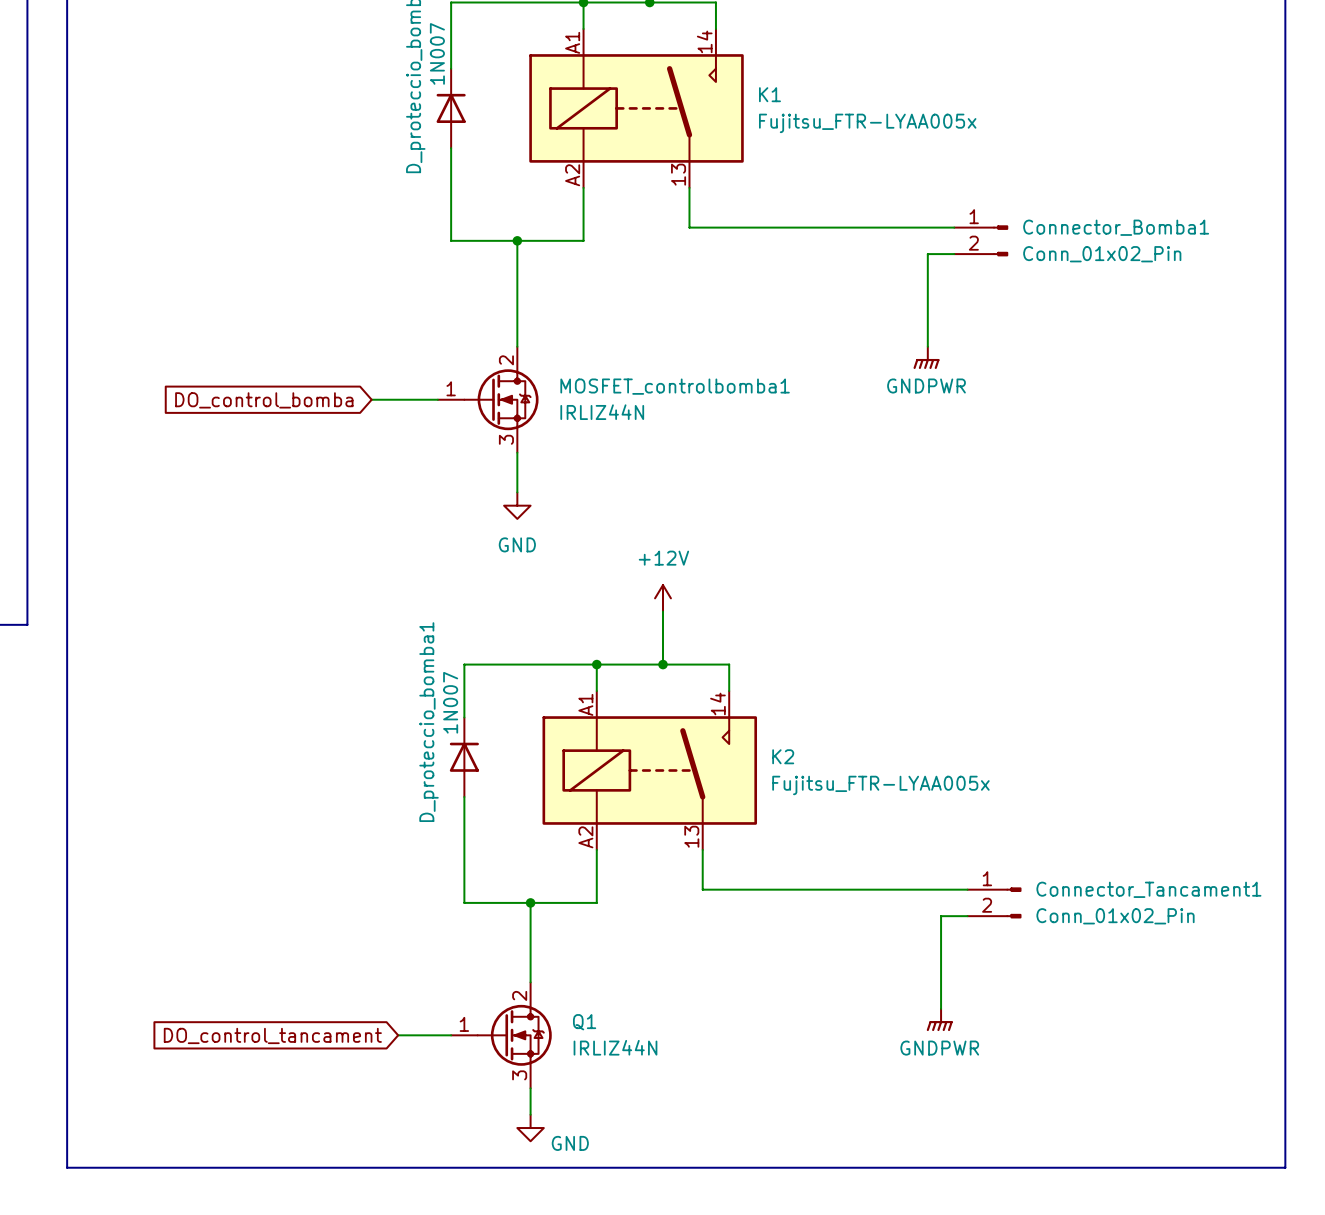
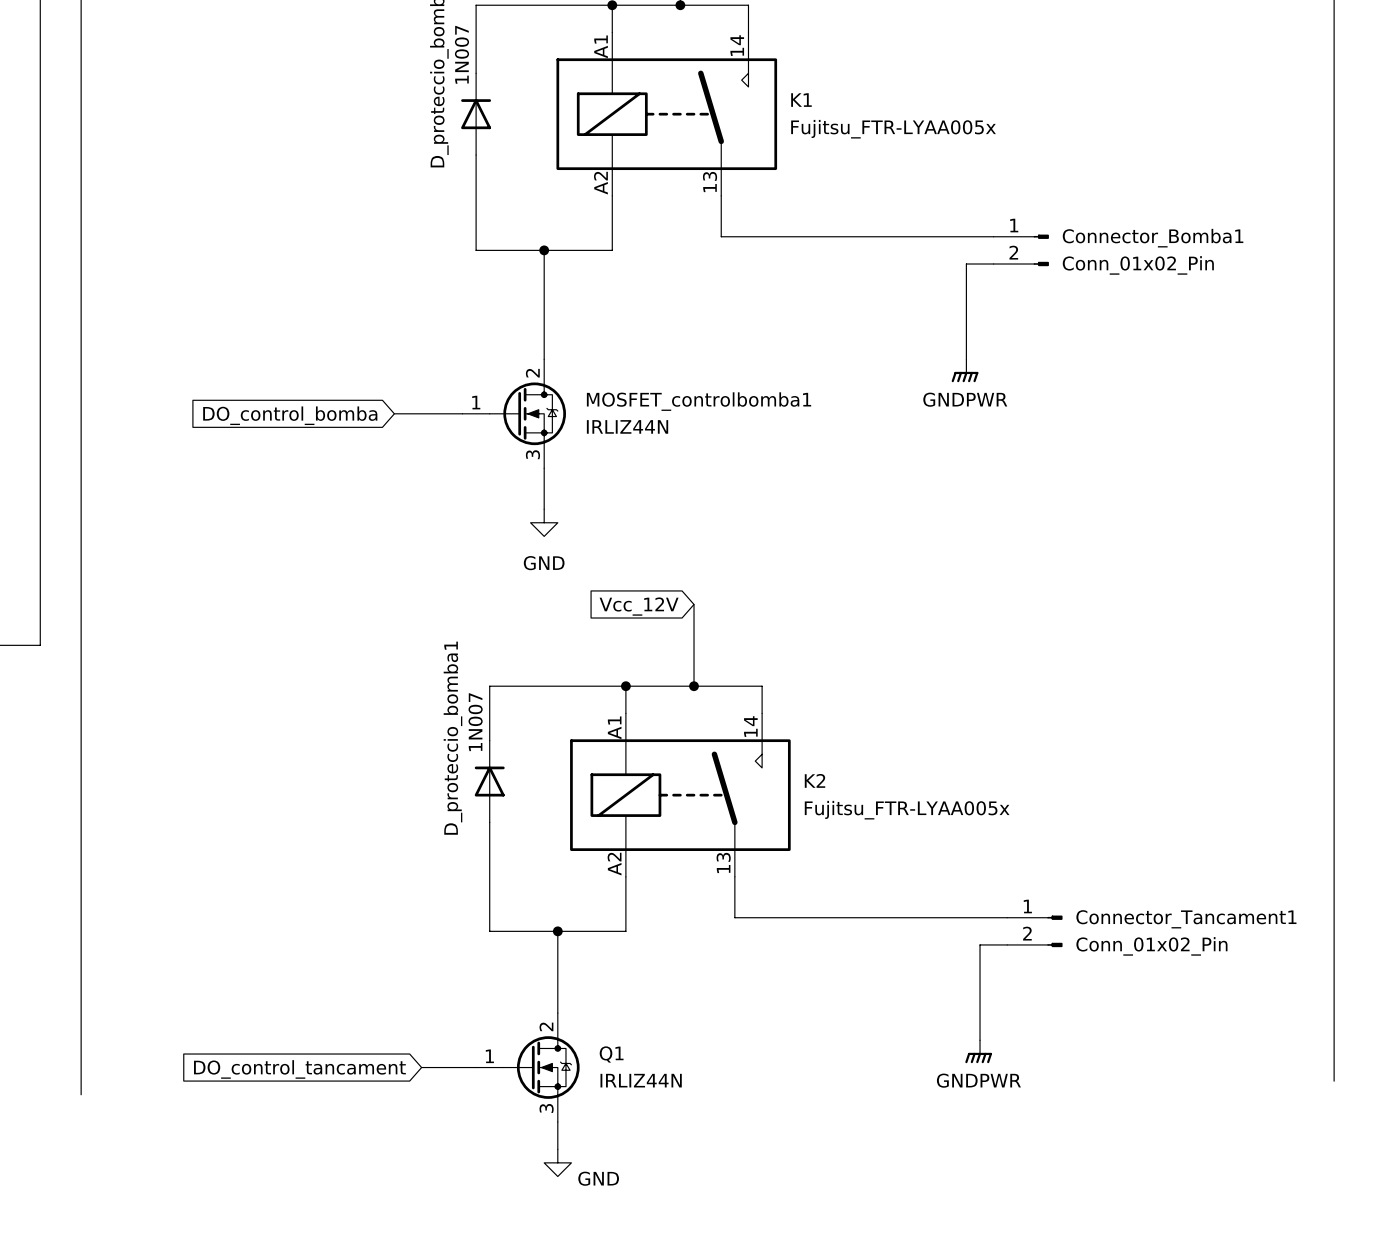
global label: none -> Vcc_12V (639, 606)
power symbol: +12V (662, 598) -> none
bus: (1285, 1048) (1285, 1167) (67, 1167) (67, 1061) -> none

